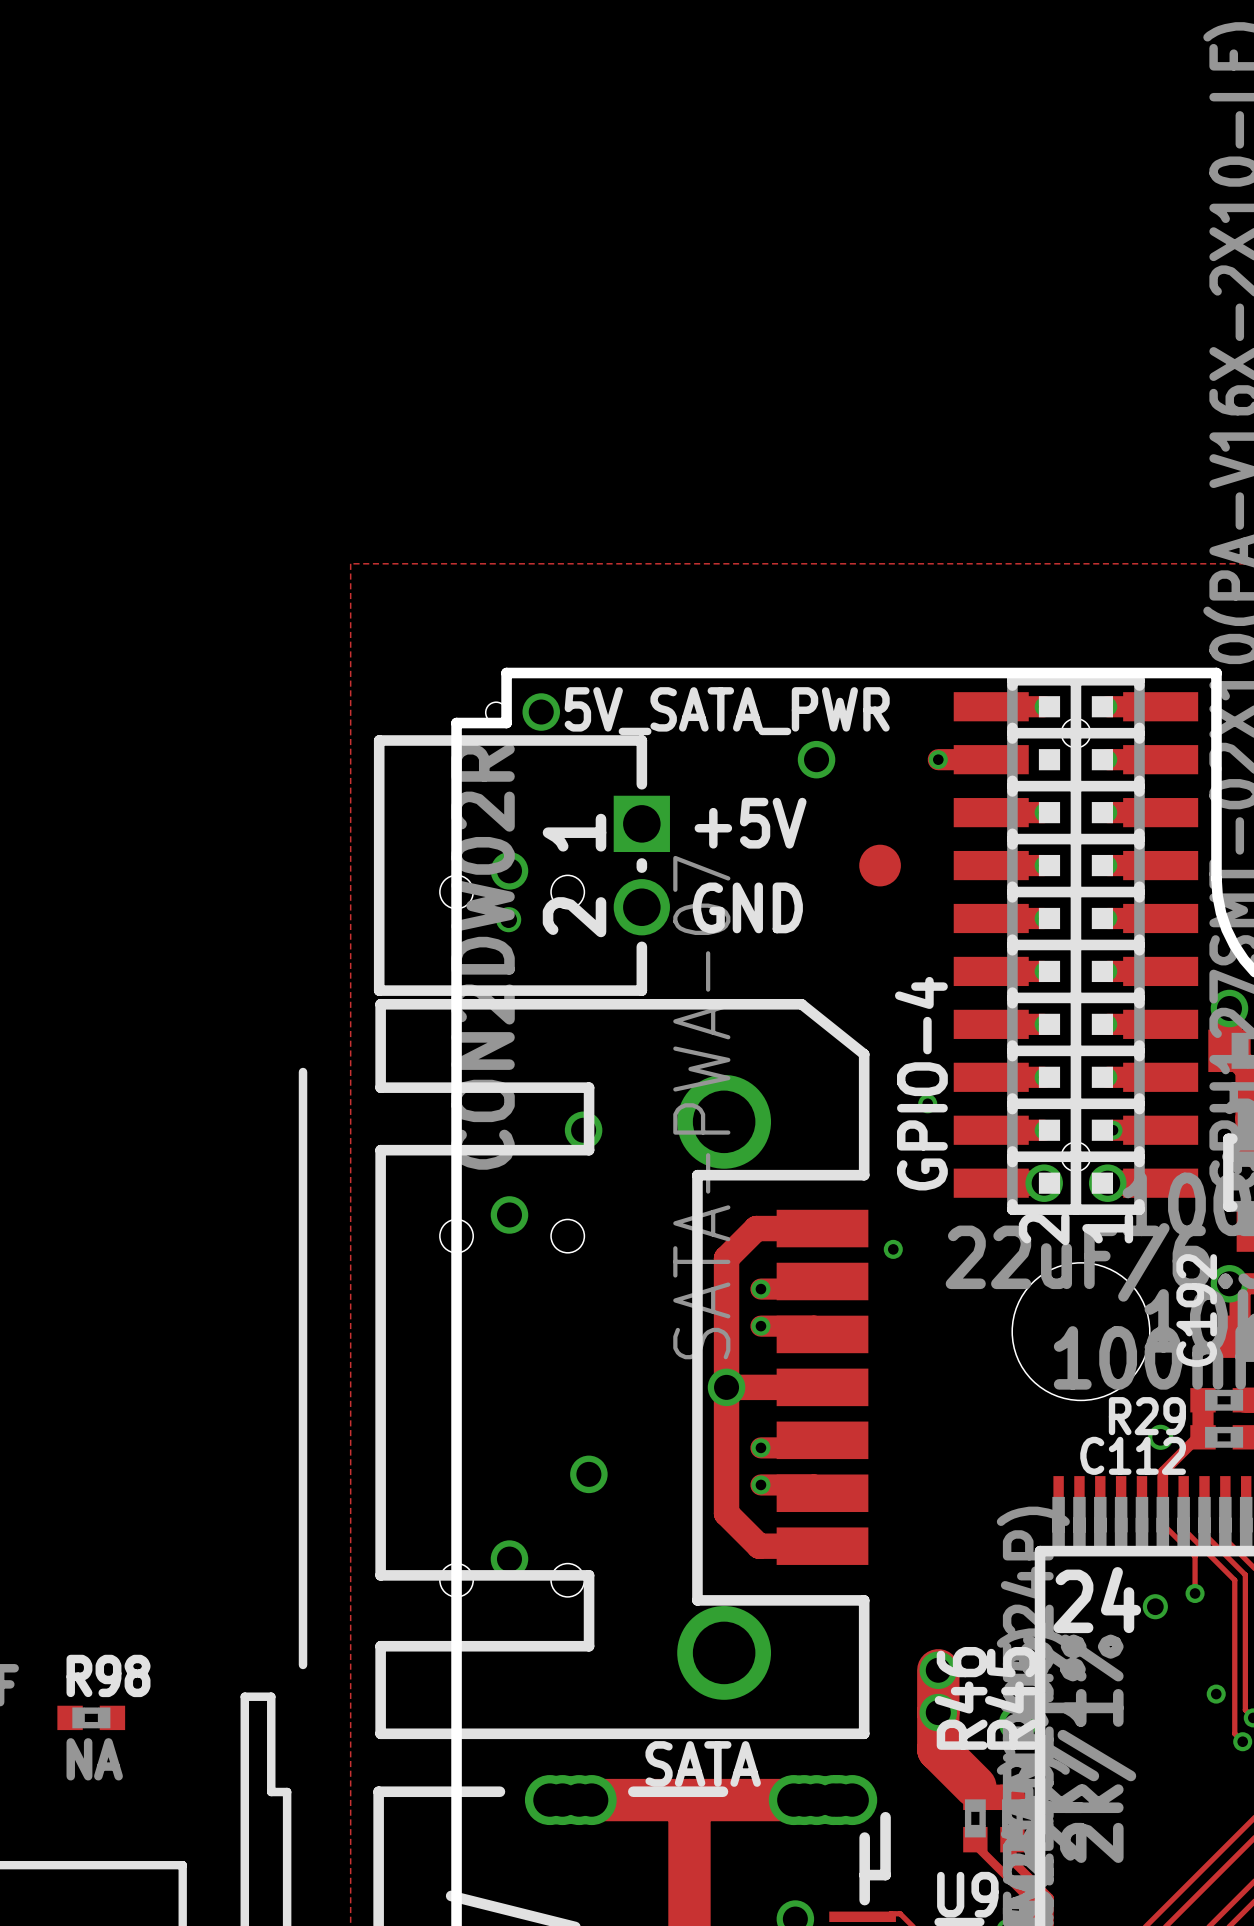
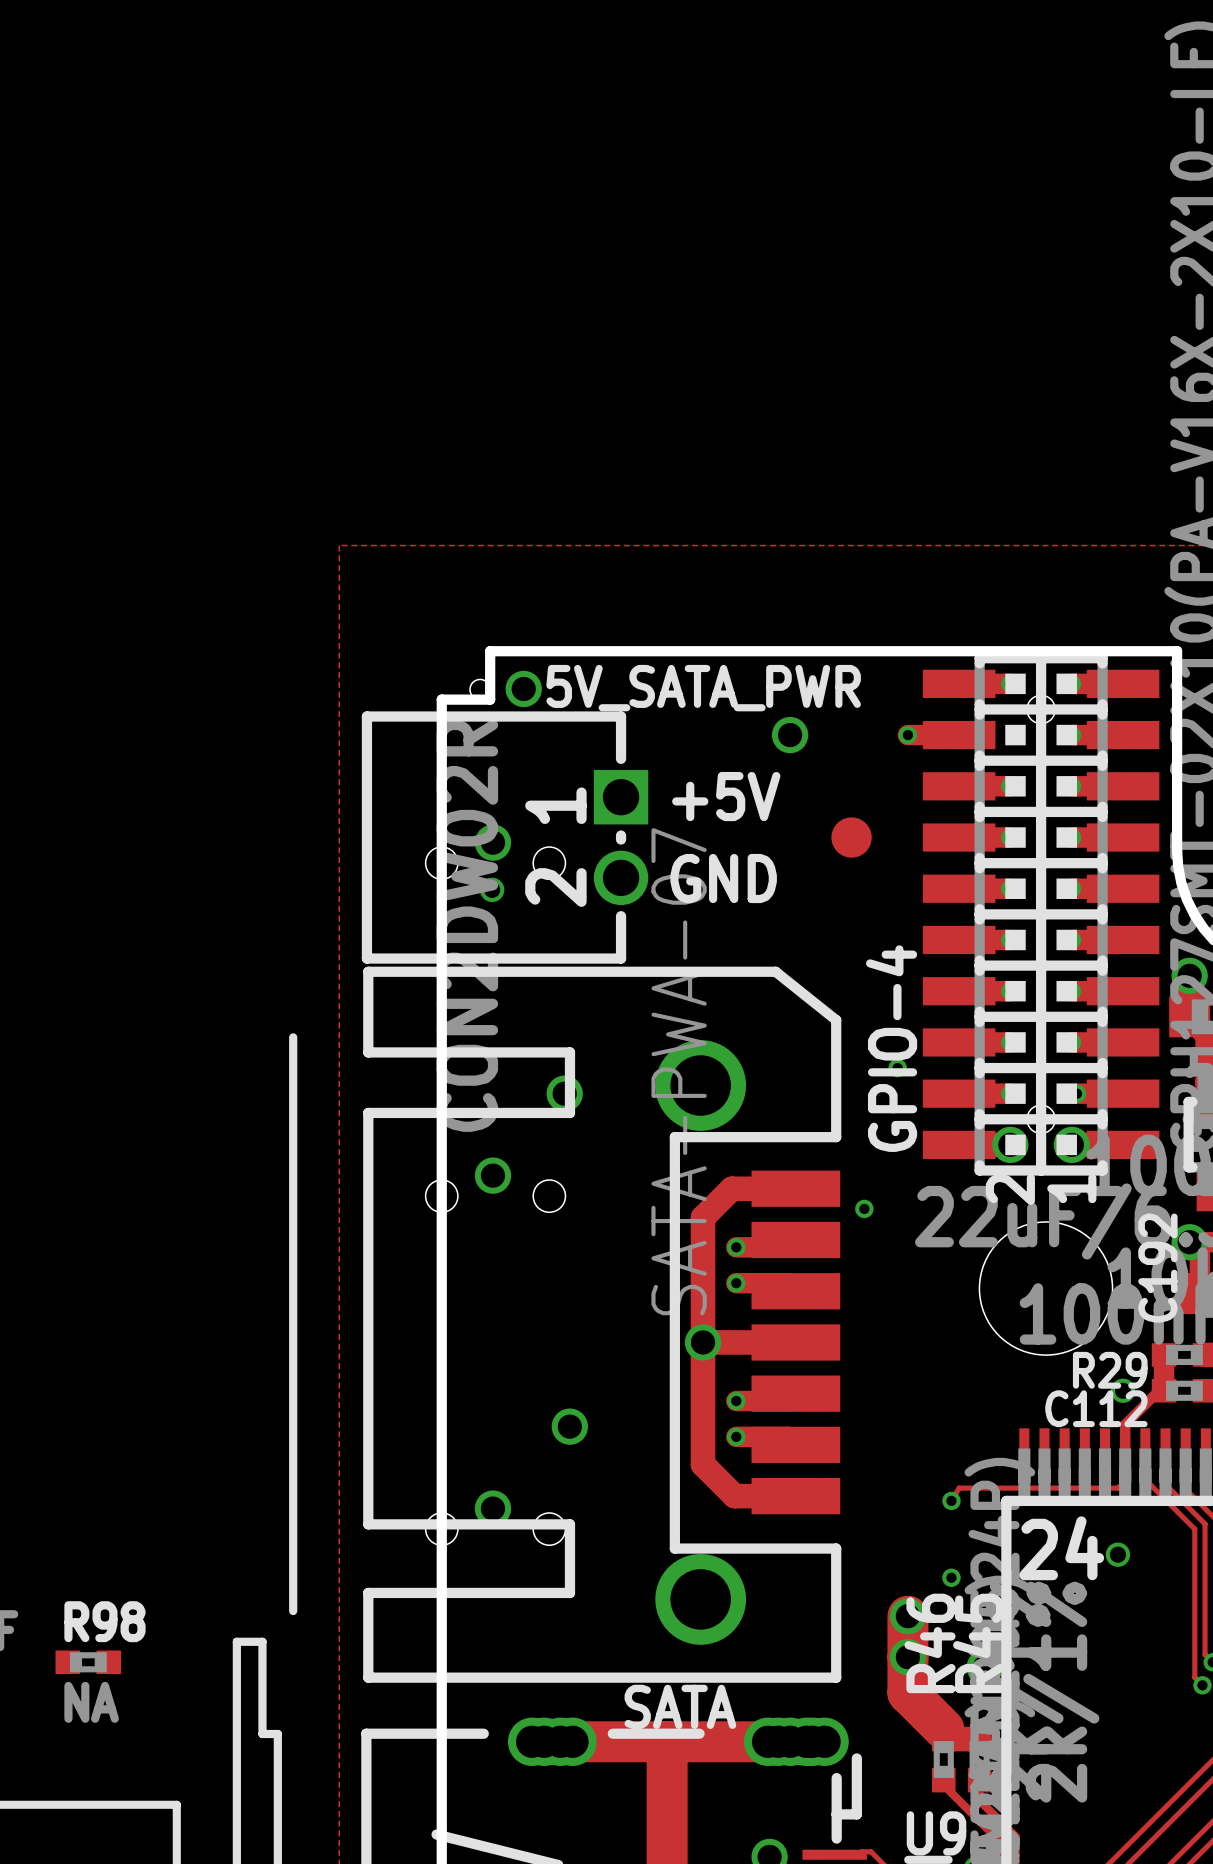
track: (1162, 1524) (1195, 1556) (1195, 1593) -> (1125, 1474) (1125, 1480) (1117, 1488) (959, 1488) (951, 1500)
via: none -> (951, 1500)
via: (1195, 1593) -> none
via: none -> (951, 1577)
via: (1216, 1694) -> none

